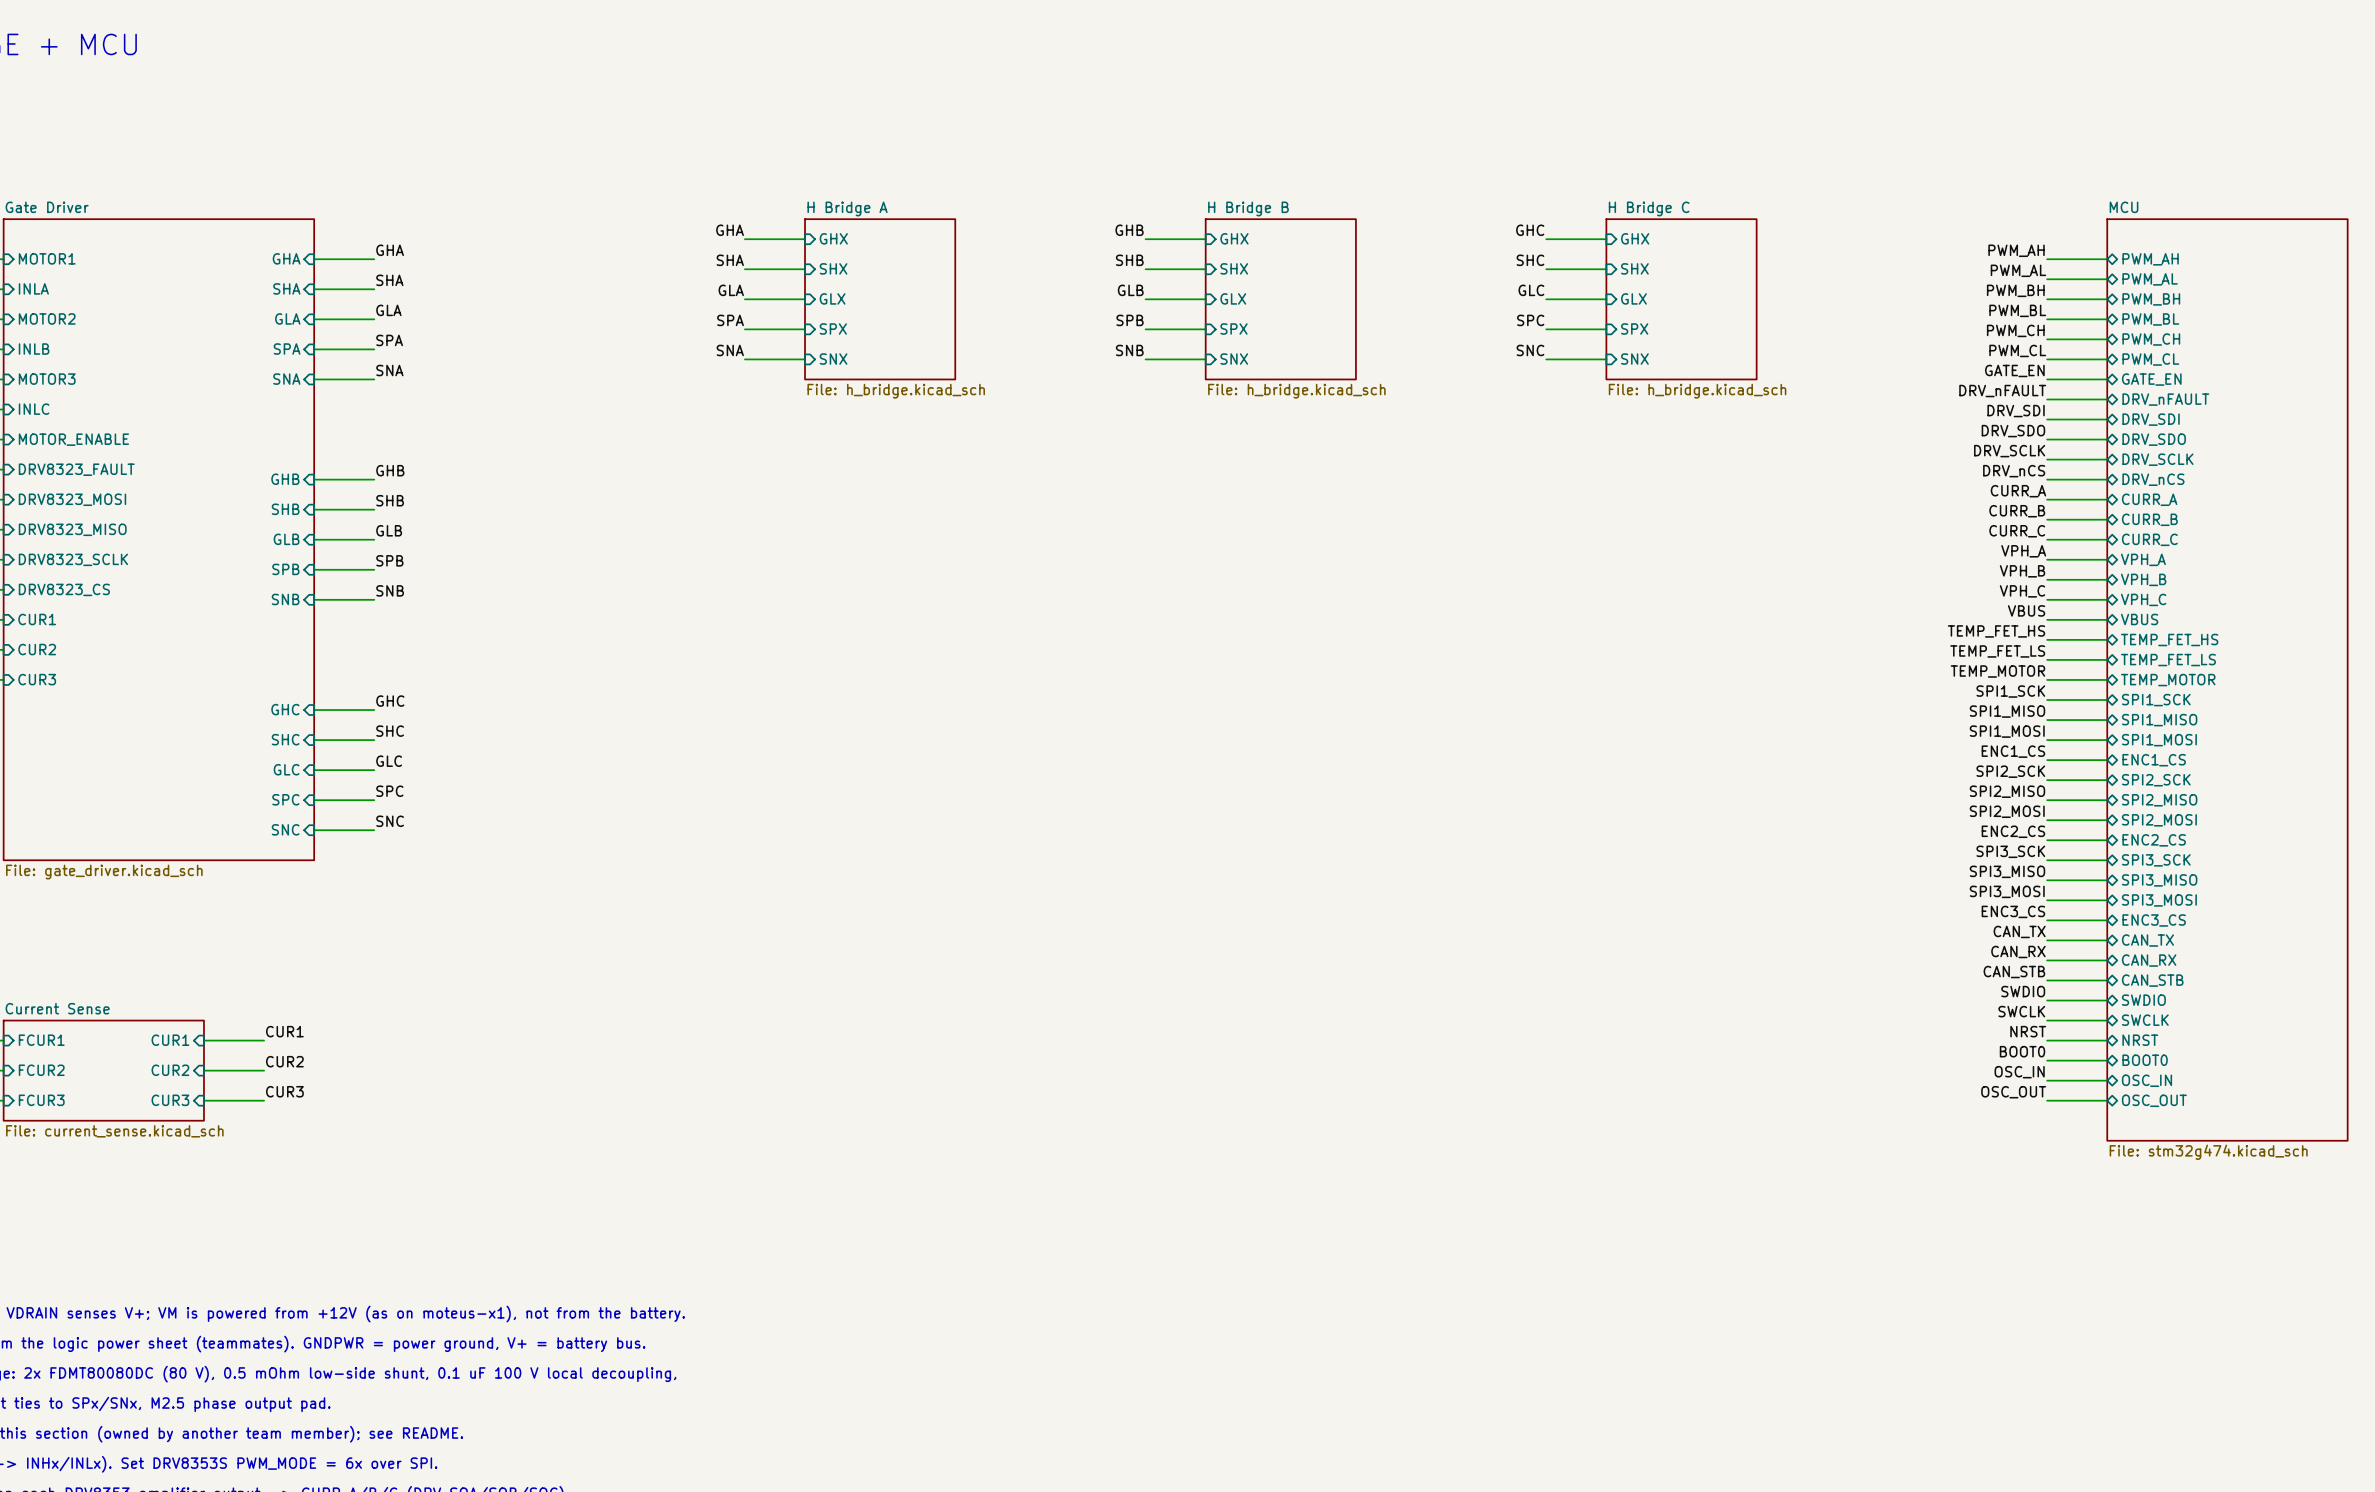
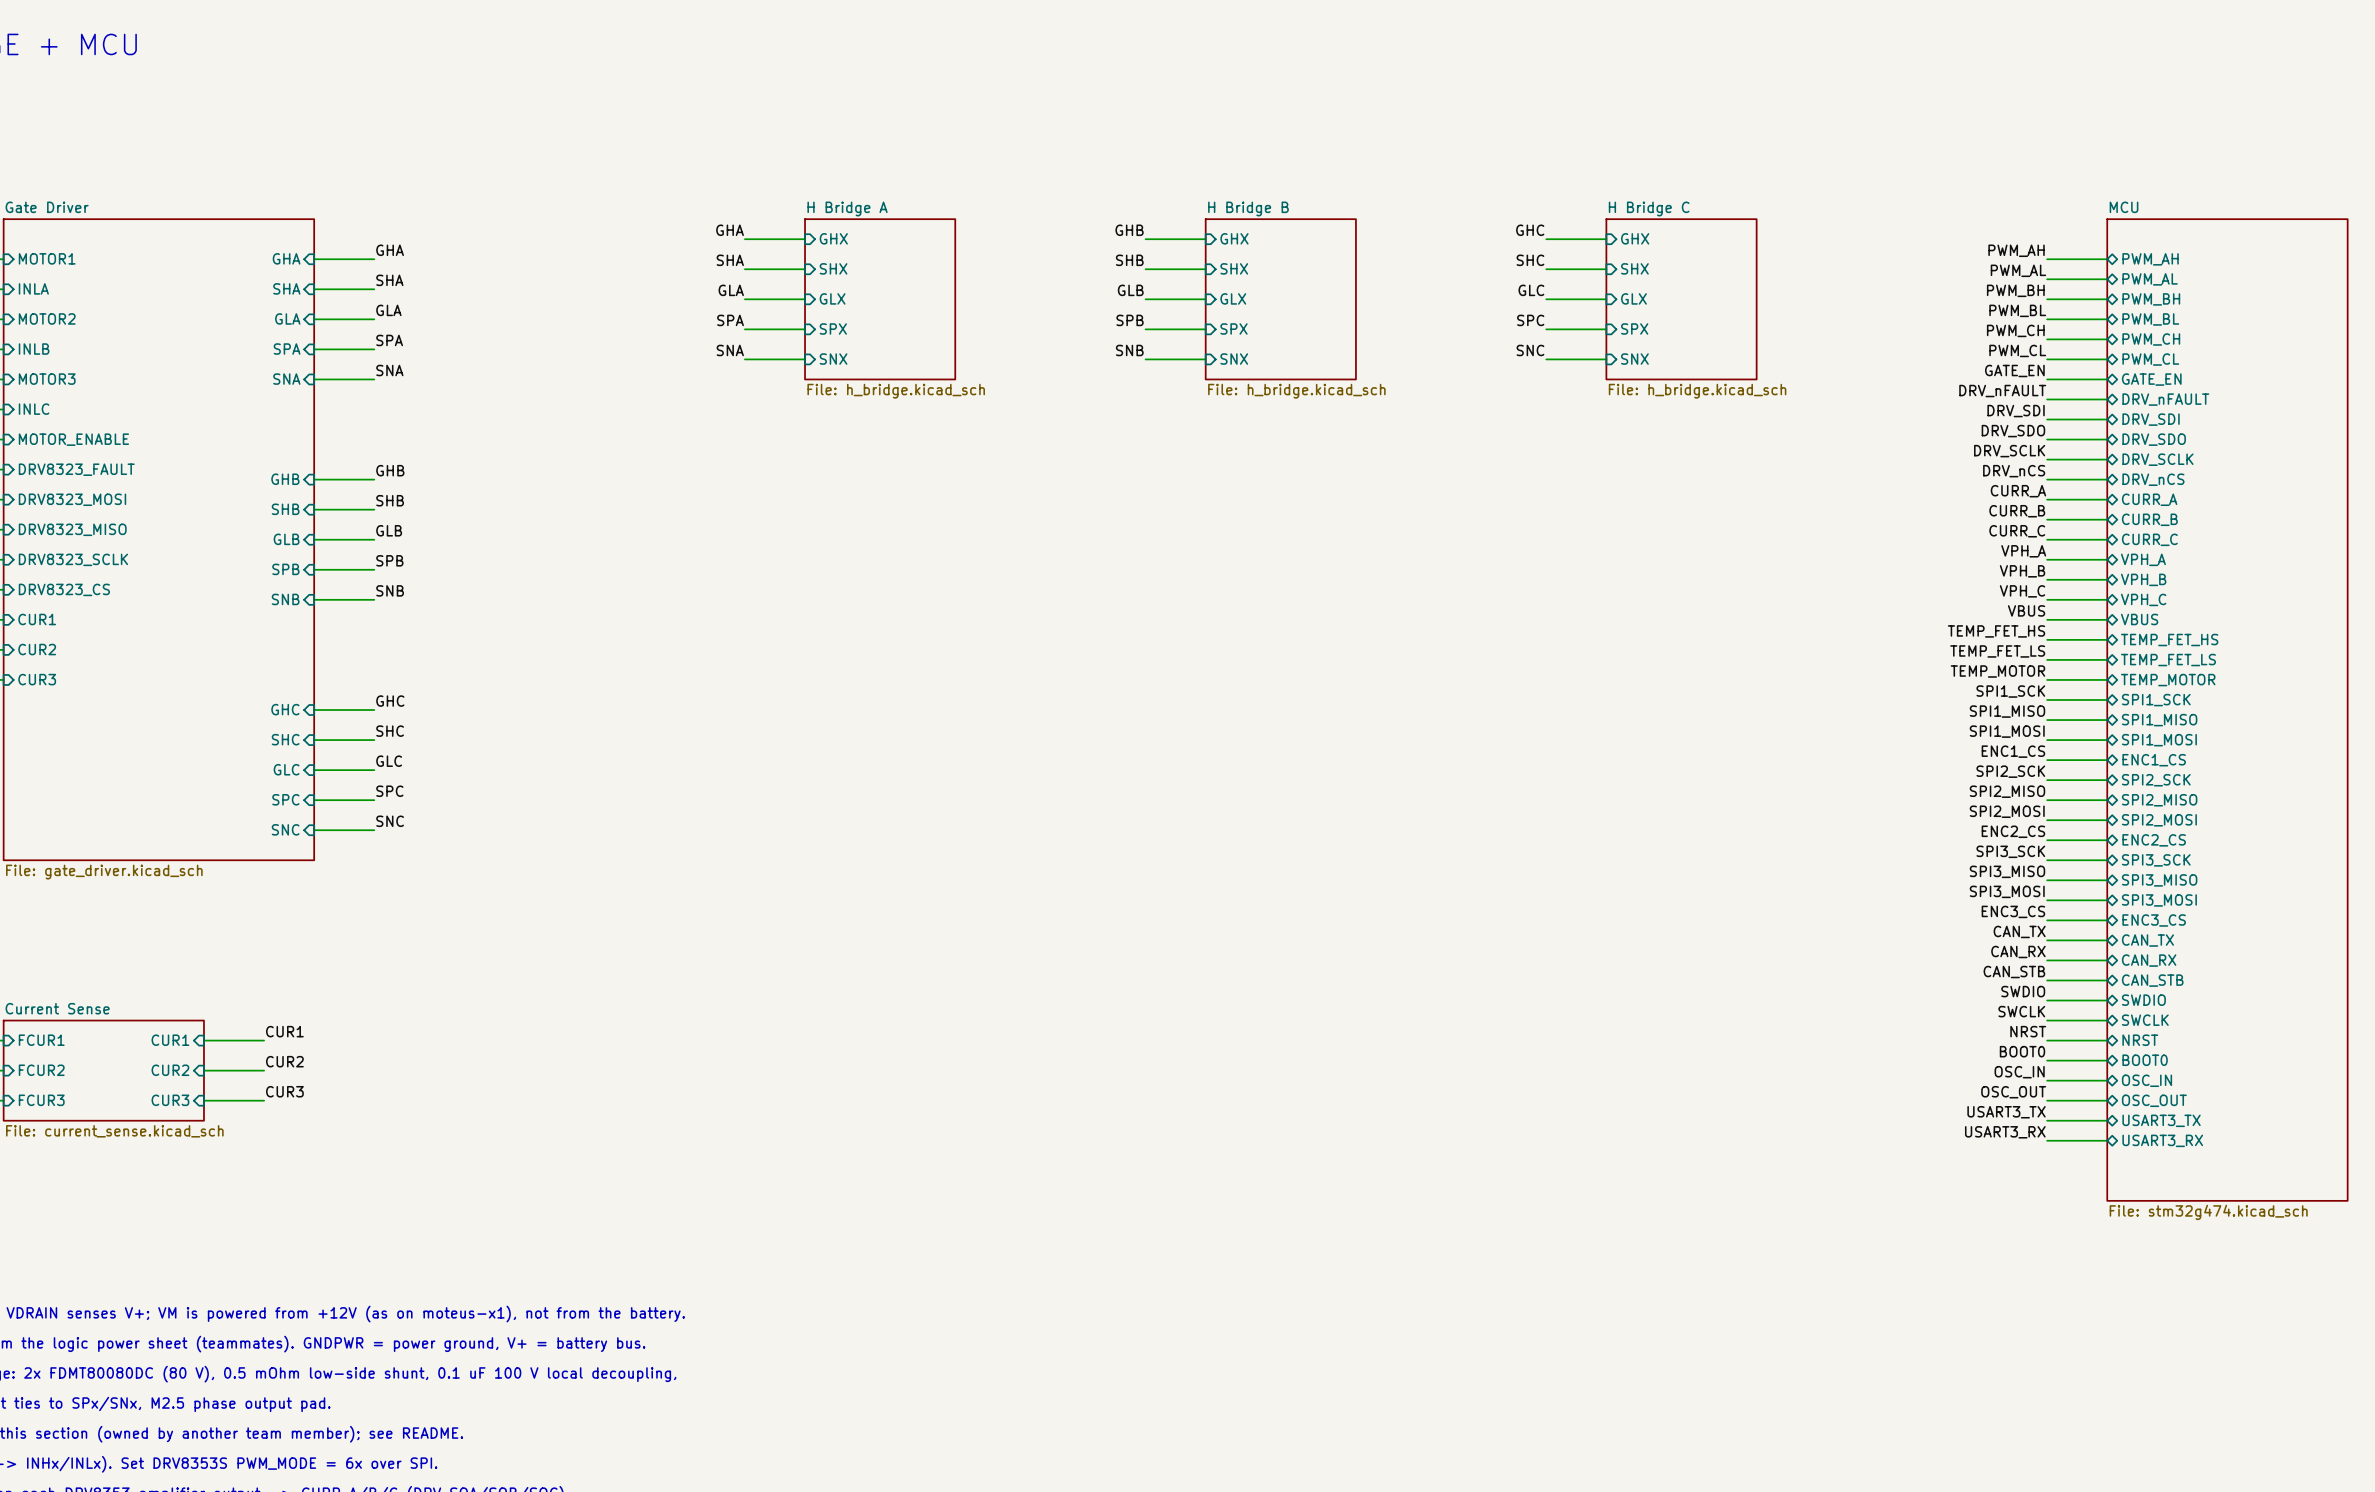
sheet MCU: File: stm32g474.kicad_sch (2227, 679) -> none
sheet MCU: none -> File: stm32g474.kicad_sch (2227, 710)
label: none -> USART3_TX (2006, 1112)
wire: none -> (2047, 1120) (2107, 1120)
sheet pin: none -> USART3_TX (2161, 1120)
label: none -> USART3_RX (2005, 1132)
wire: none -> (2047, 1140) (2107, 1140)
sheet pin: none -> USART3_RX (2162, 1140)

